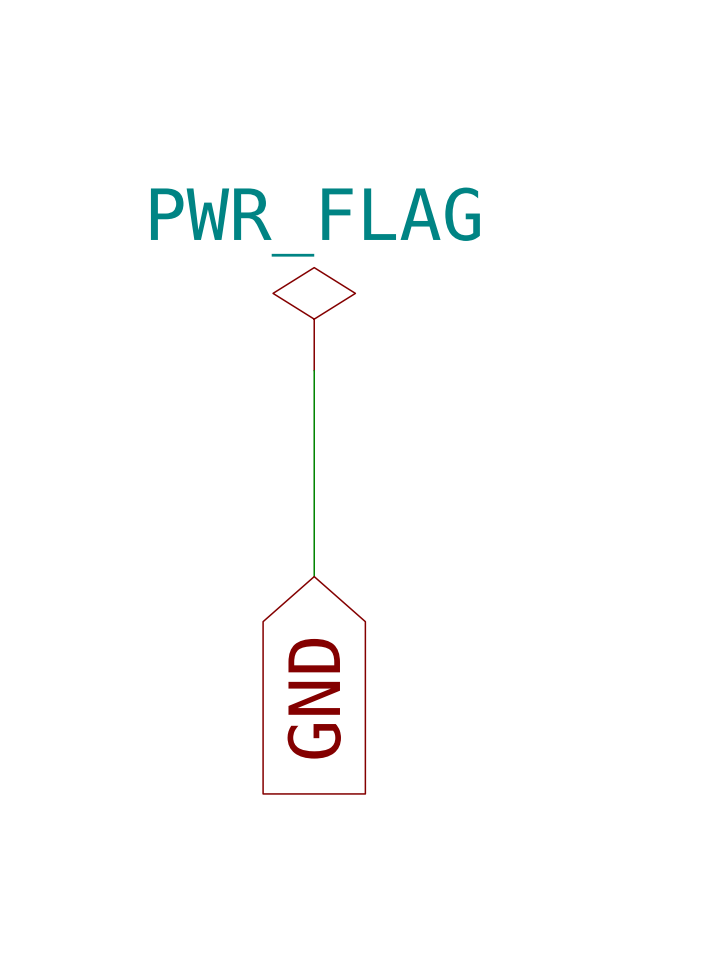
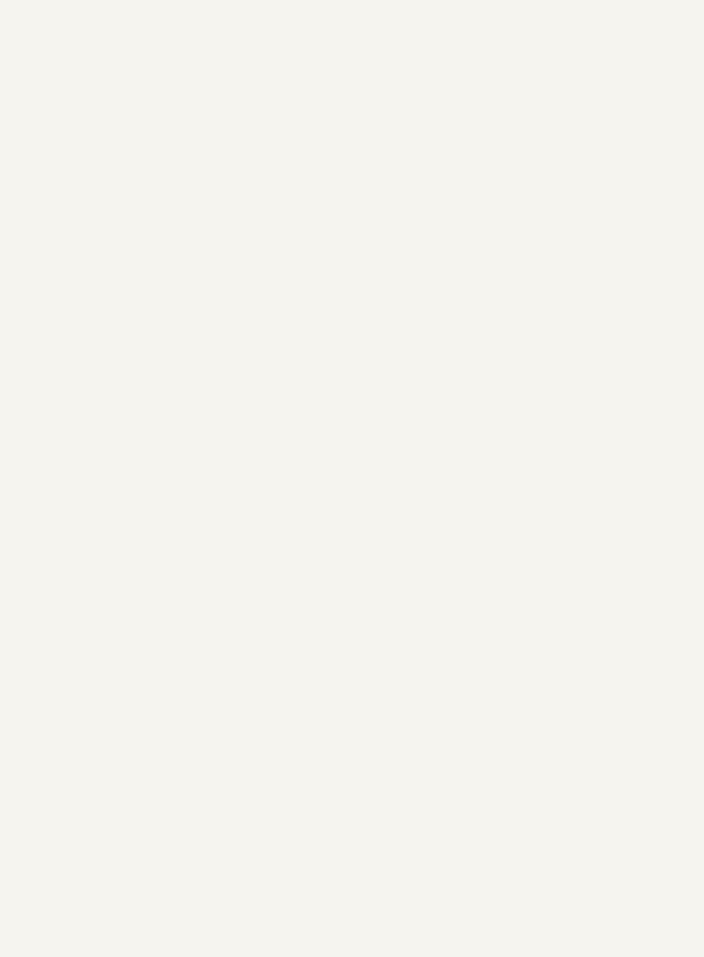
power symbol: PWR_FLAG (314, 319) -> none
wire: (314, 370) (314, 576) -> none
global label: GND (314, 698) -> none

